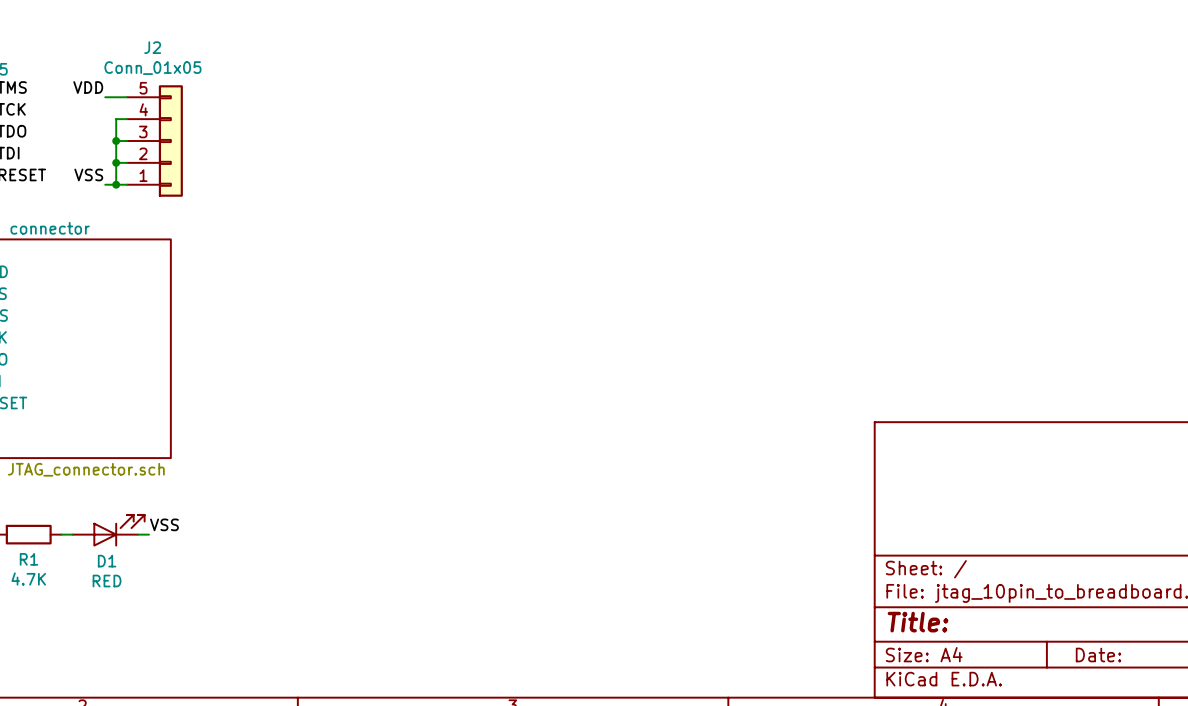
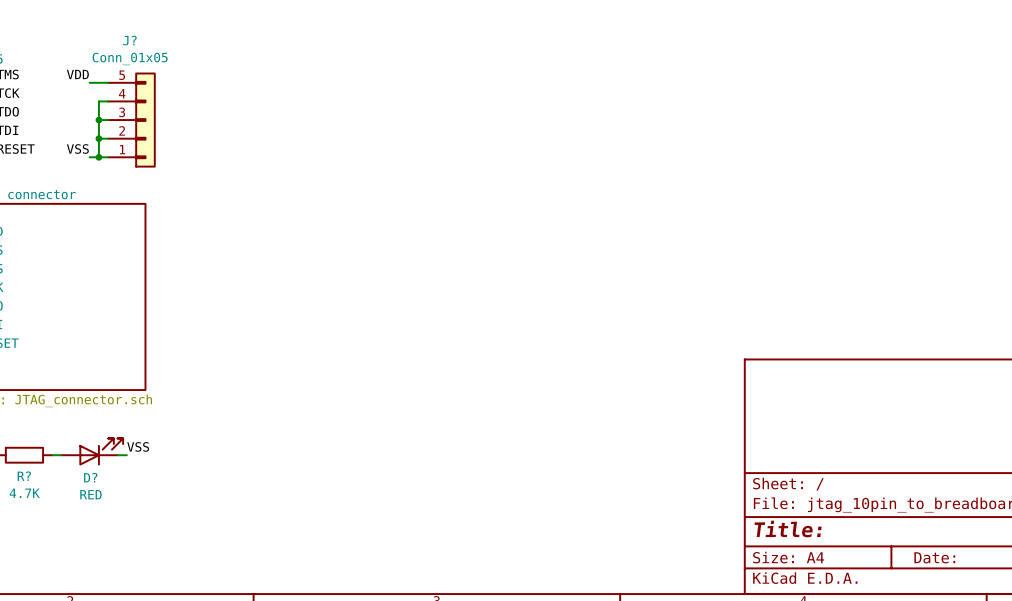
J2 name: J2 (152, 47) -> J? (129, 40)
R1 name: R1 (28, 559) -> R? (24, 476)
D1 name: D1 (107, 561) -> D? (90, 477)

